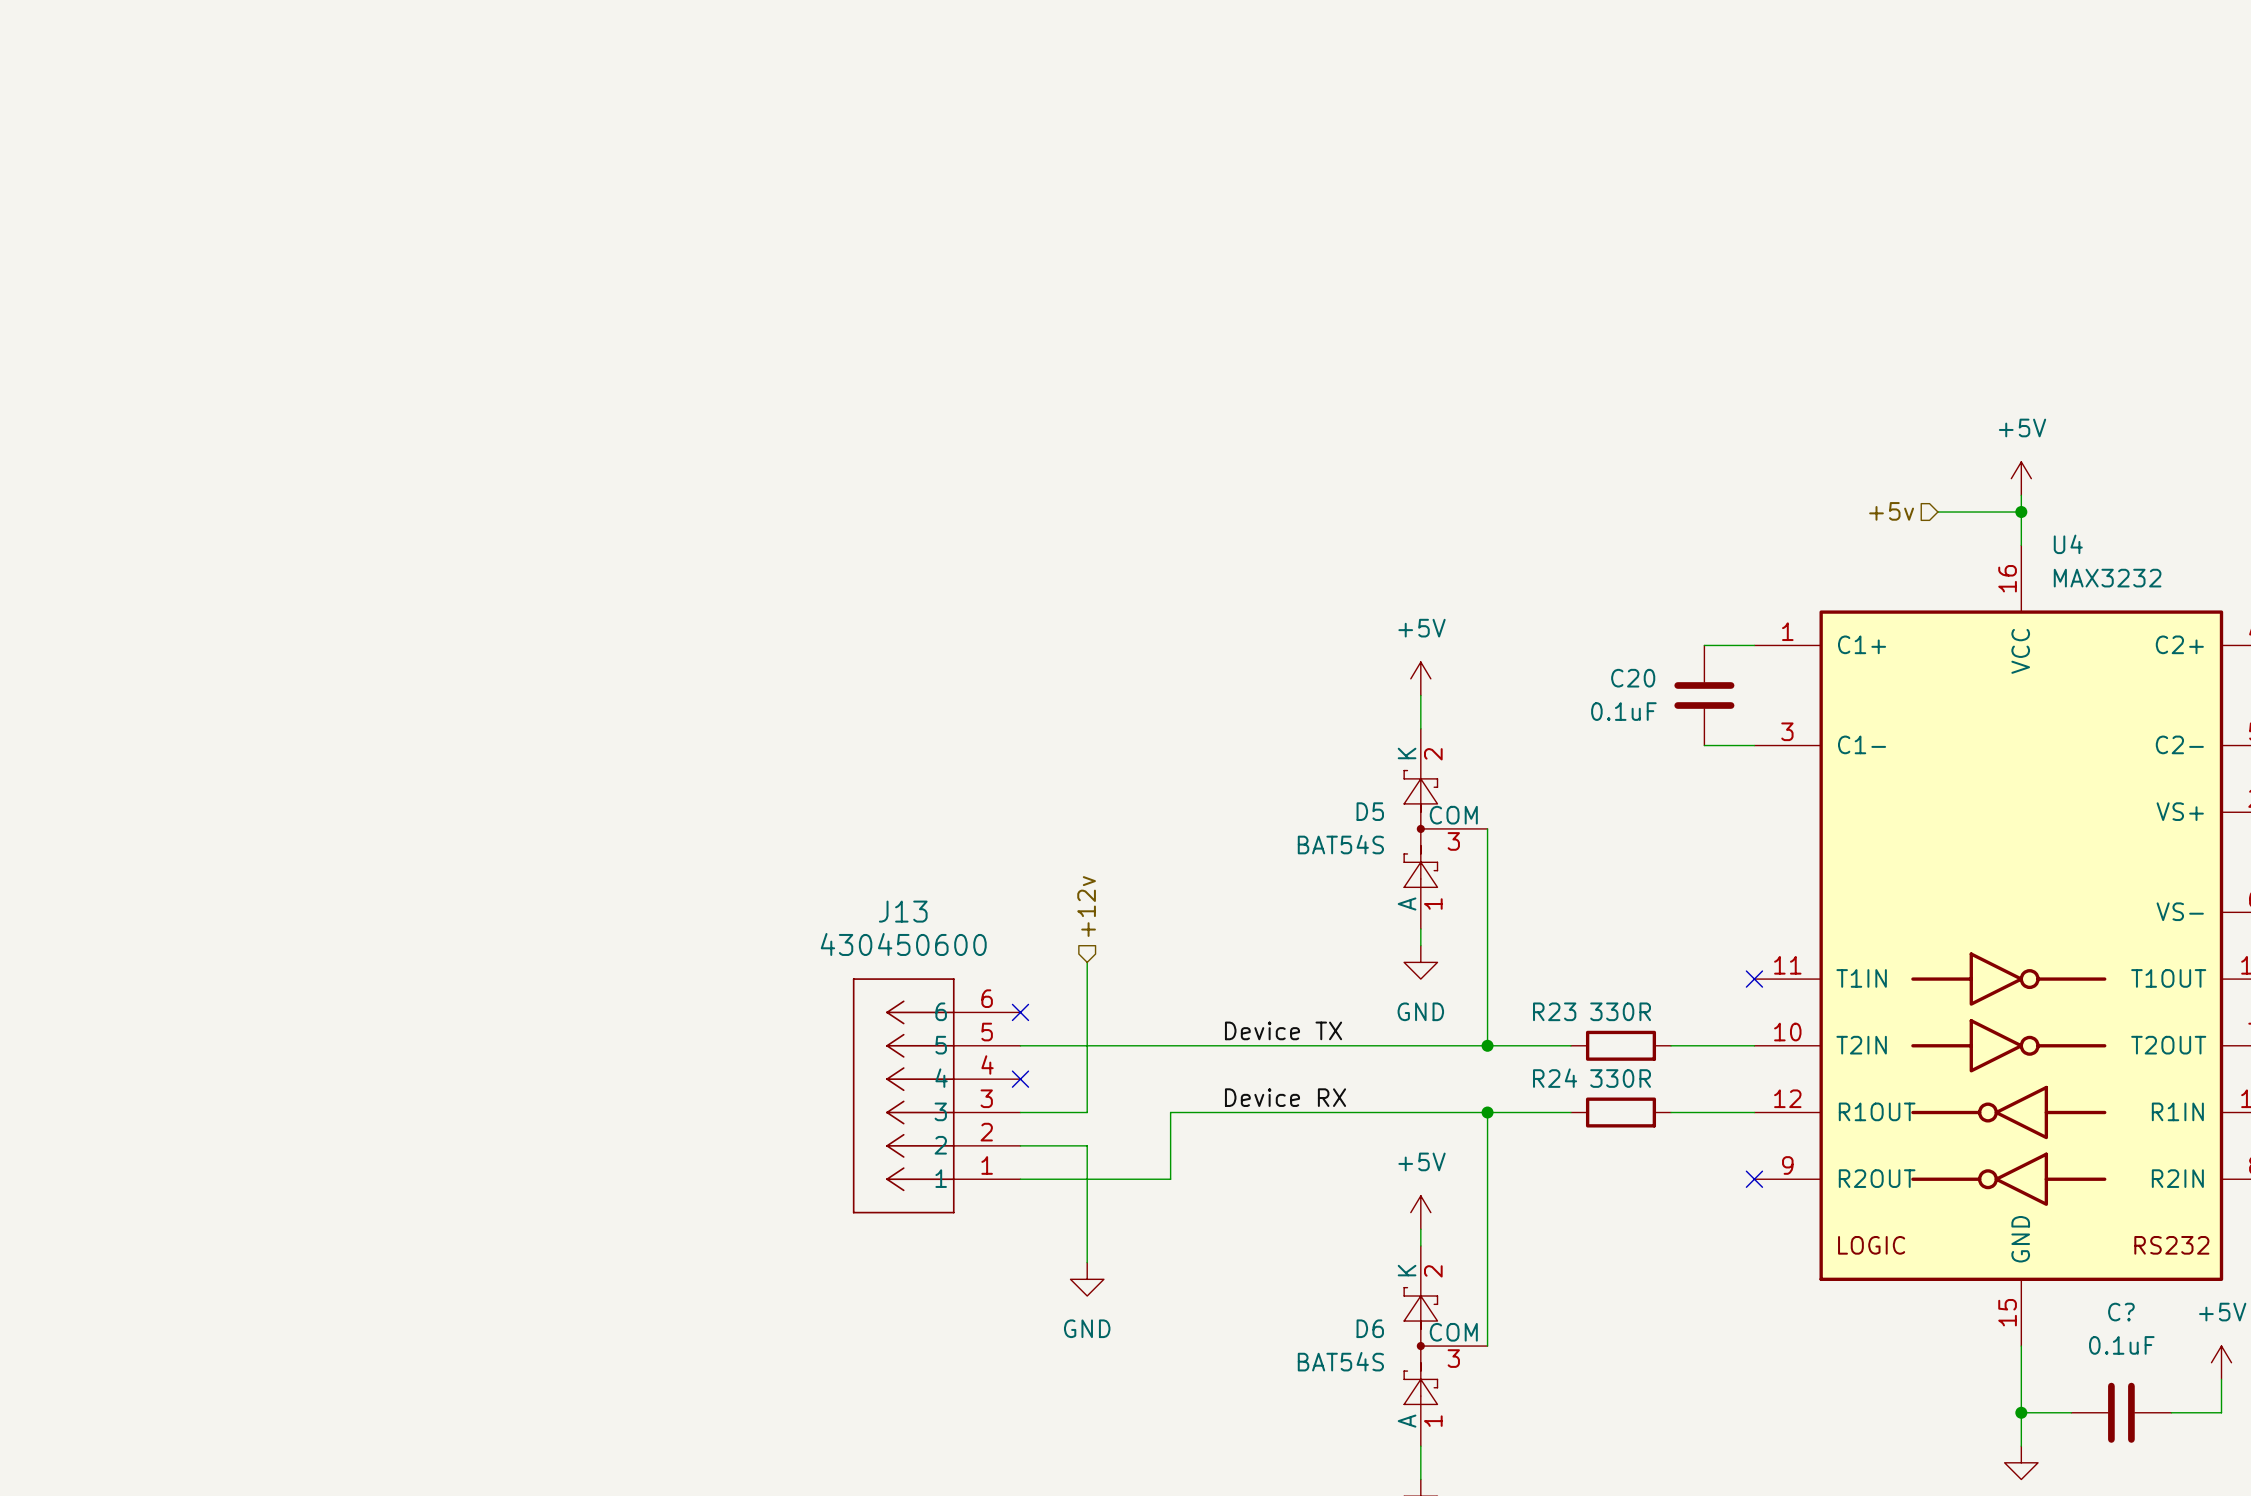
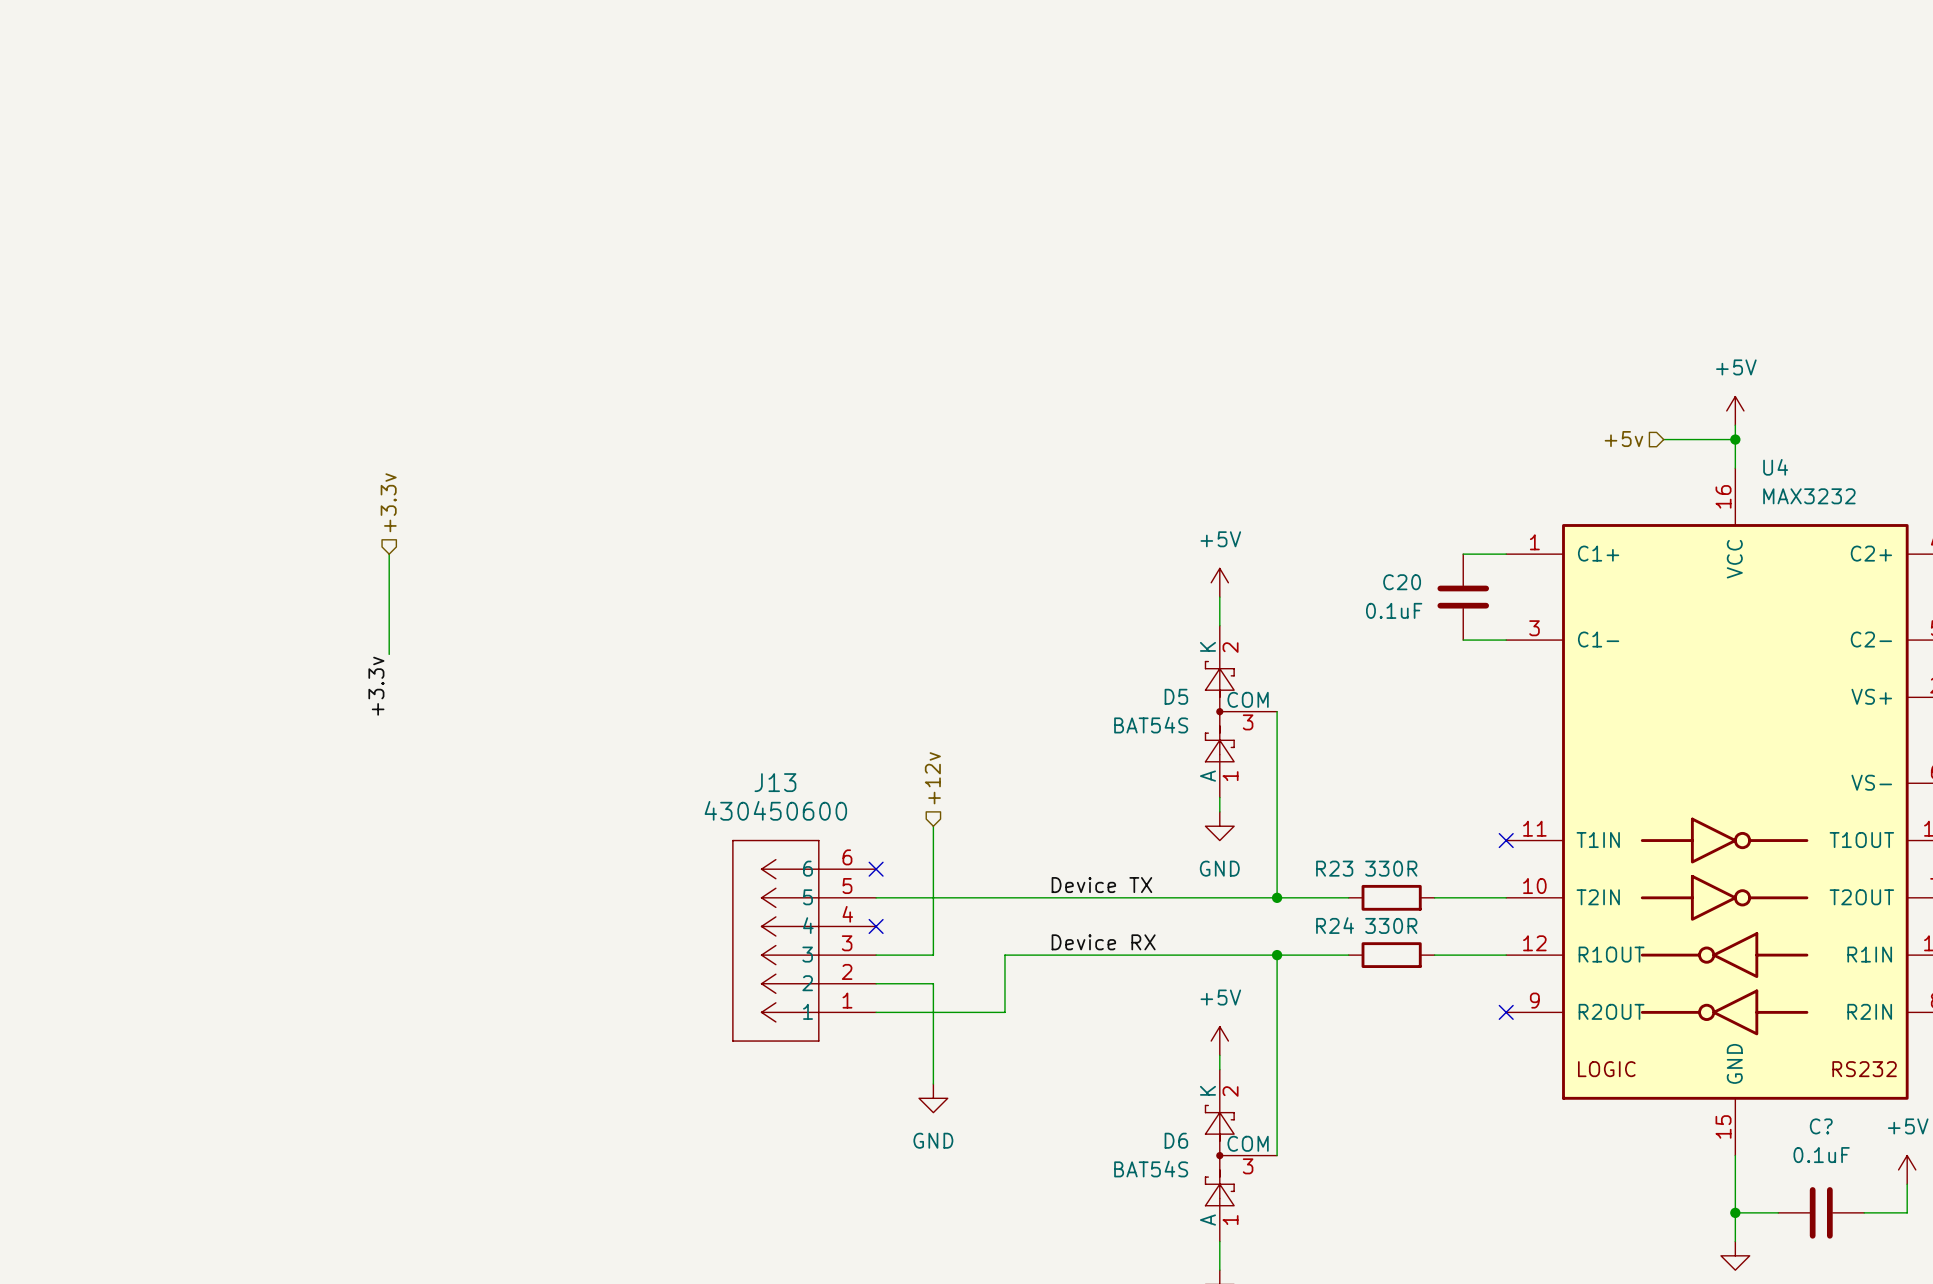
hierarchical label: none -> +3.3v (388, 502)
wire: none -> (389, 554) (389, 654)
label: none -> +3.3v (376, 686)

